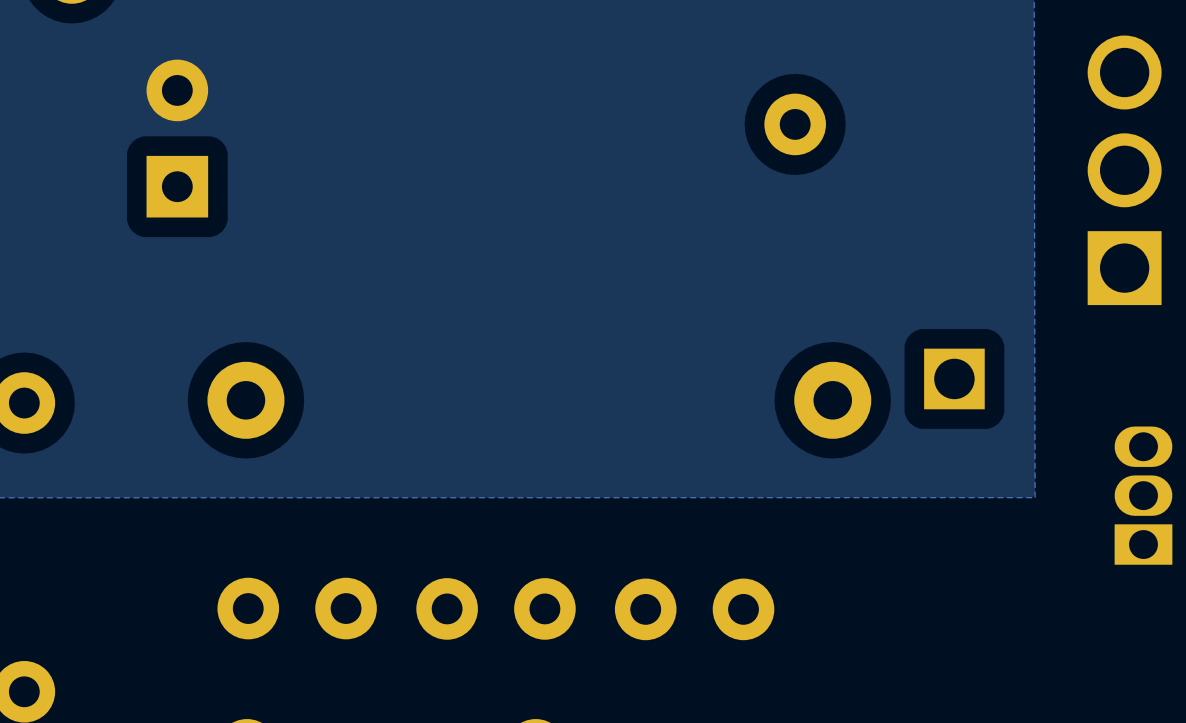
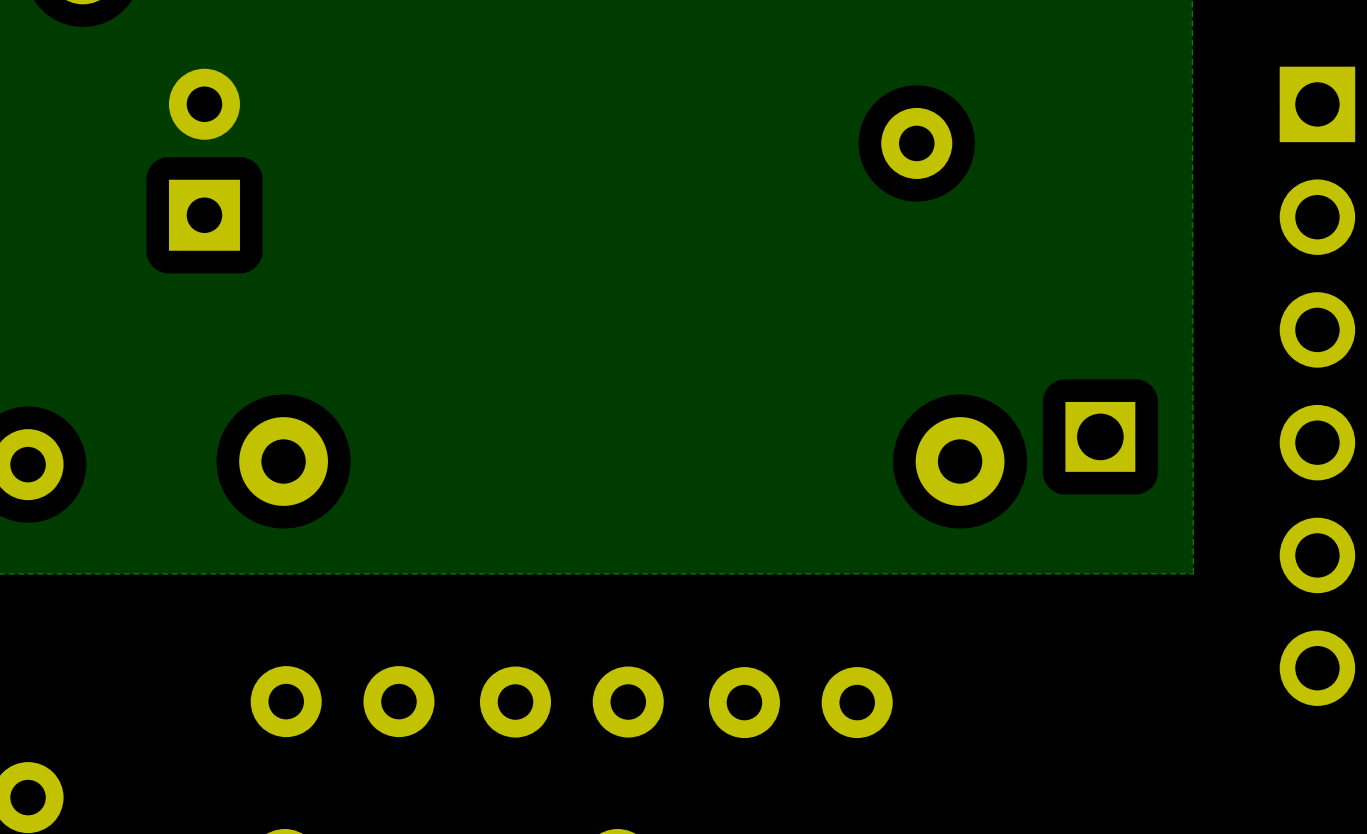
part: (1124, 170) -> none
part: none -> (1317, 386)
part: (1143, 495) -> none

